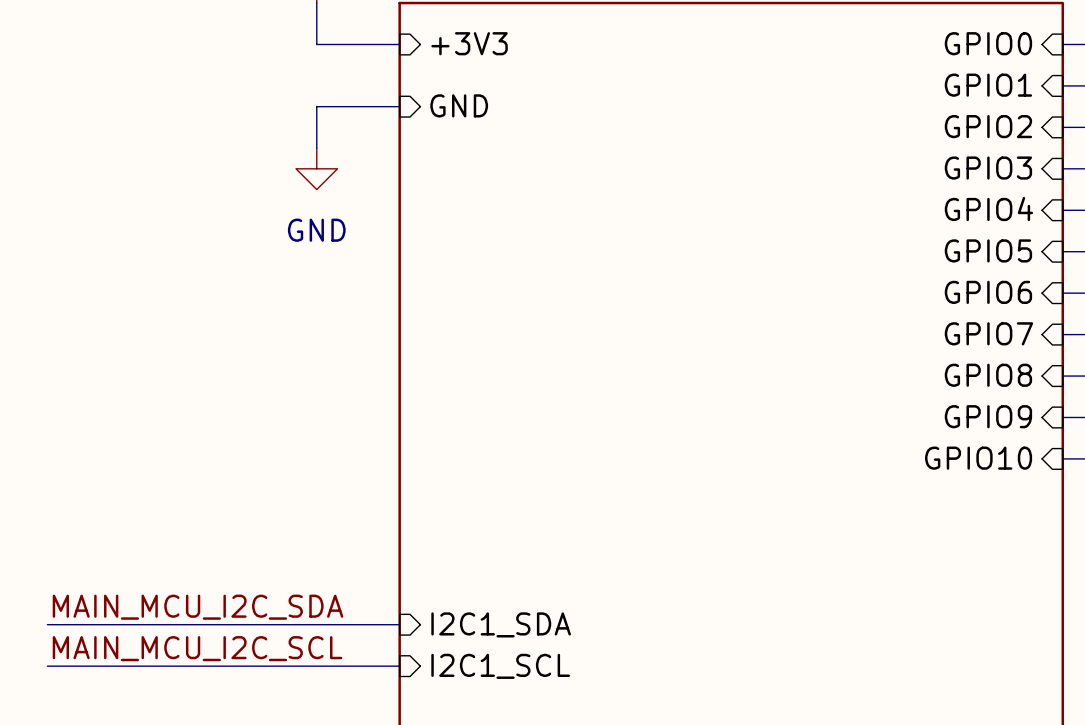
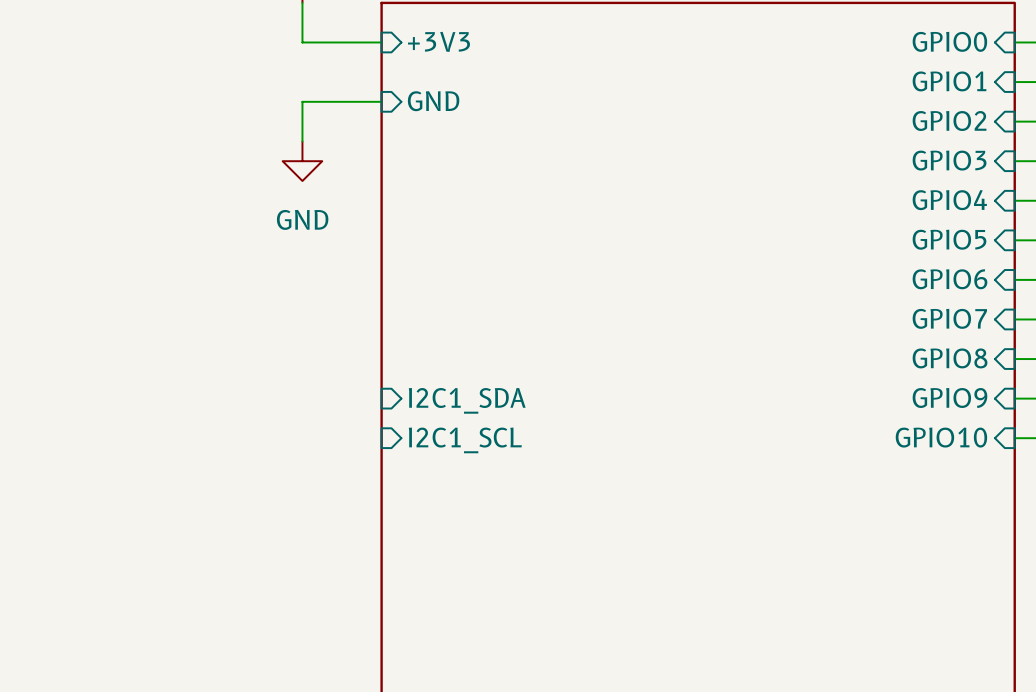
label: MAIN_MCU_I2C_SDA (198, 607) -> none
wire: (47, 624) (399, 624) -> none
sheet pin position: I2C1_SDA (501, 624) -> I2C1_SDA (467, 400)
label: MAIN_MCU_I2C_SCL (197, 648) -> none
wire: (47, 666) (399, 666) -> none
sheet pin position: I2C1_SCL (500, 666) -> I2C1_SCL (465, 440)

